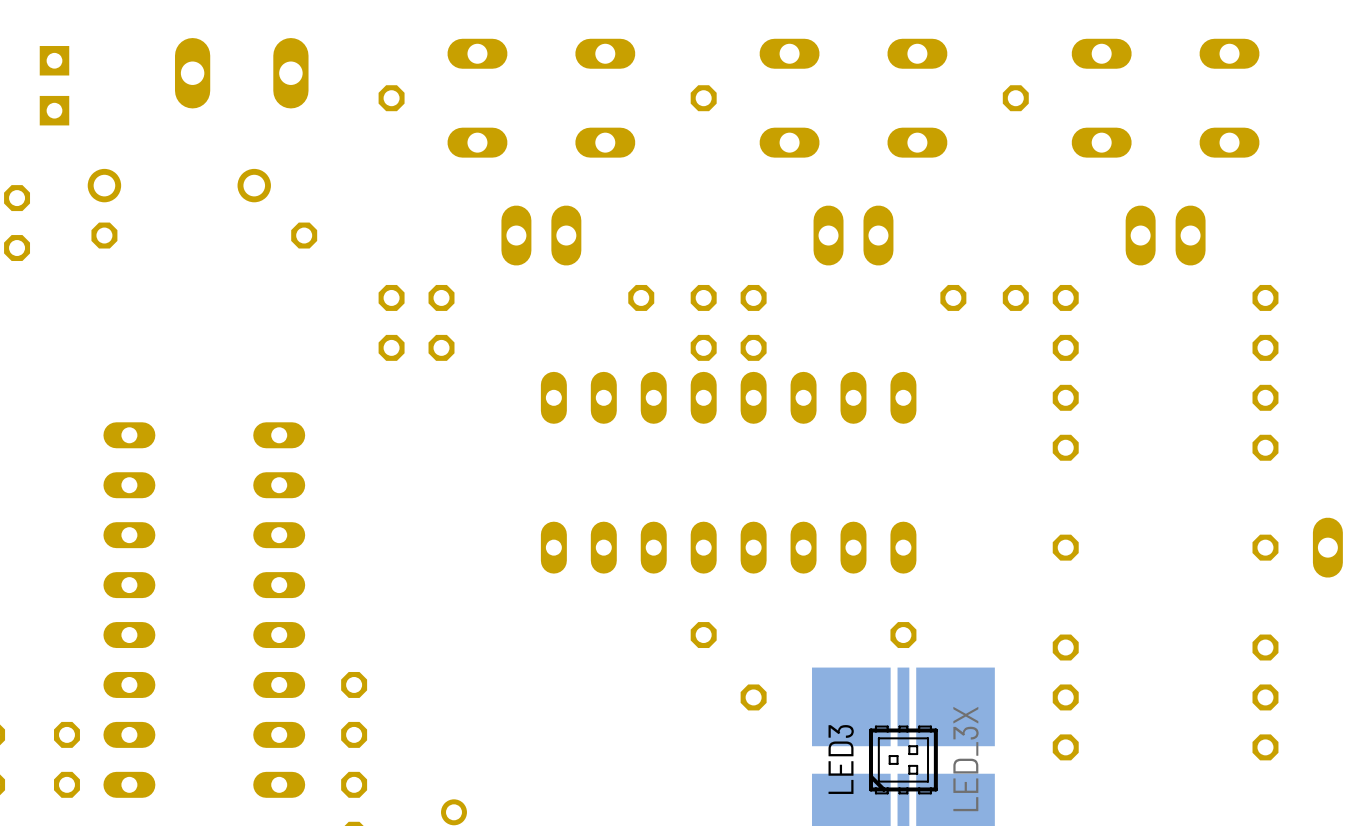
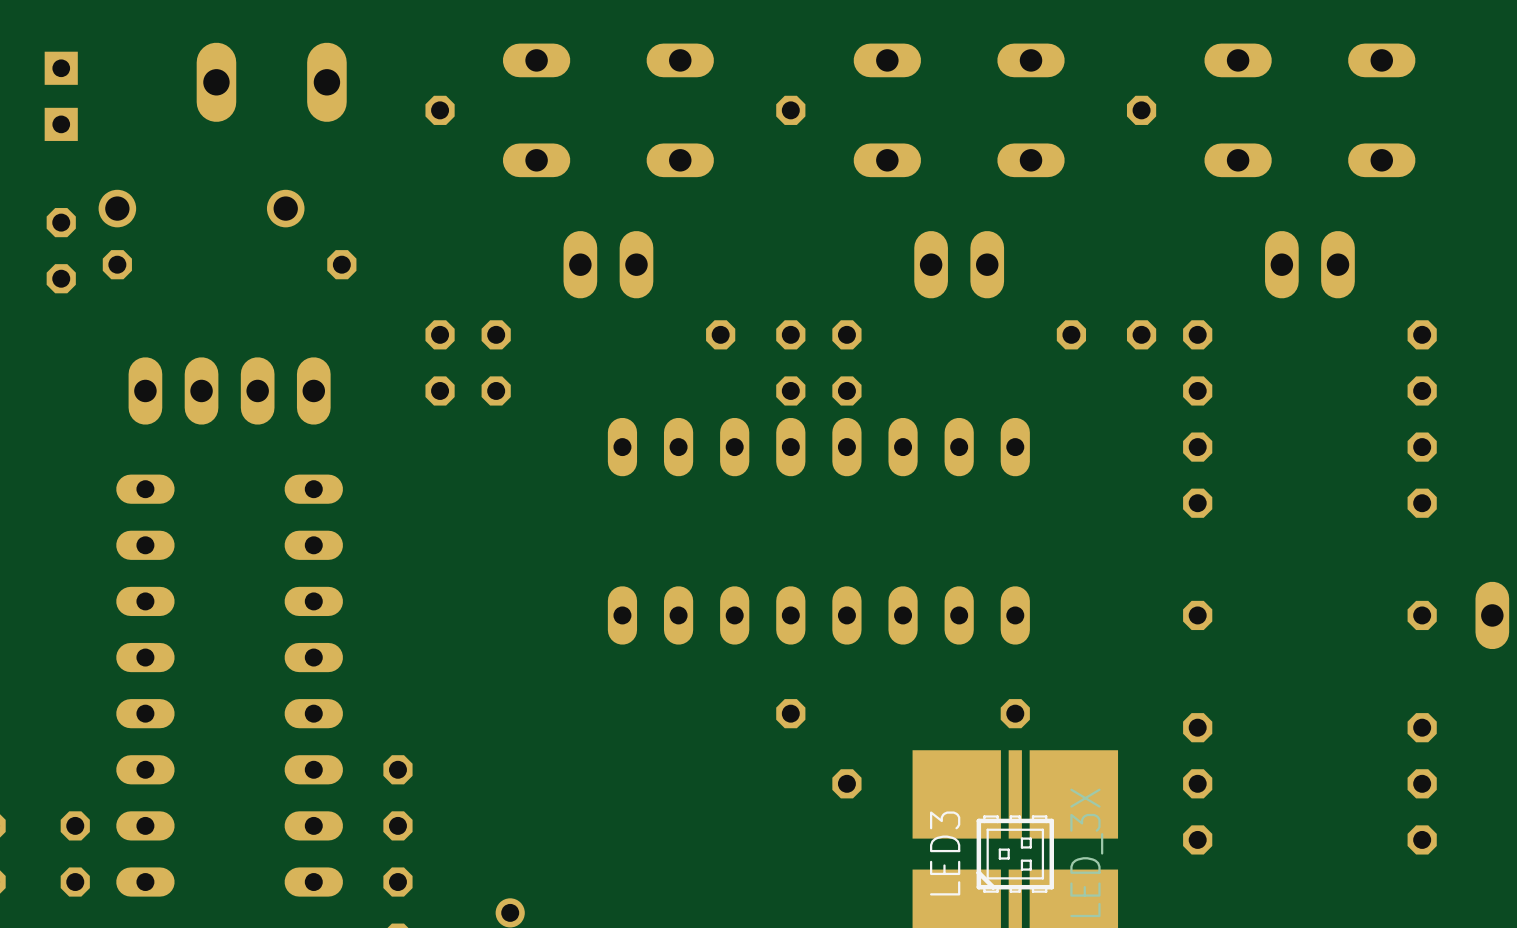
part position: (17, 223) -> (61, 250)
part: none -> (229, 390)

